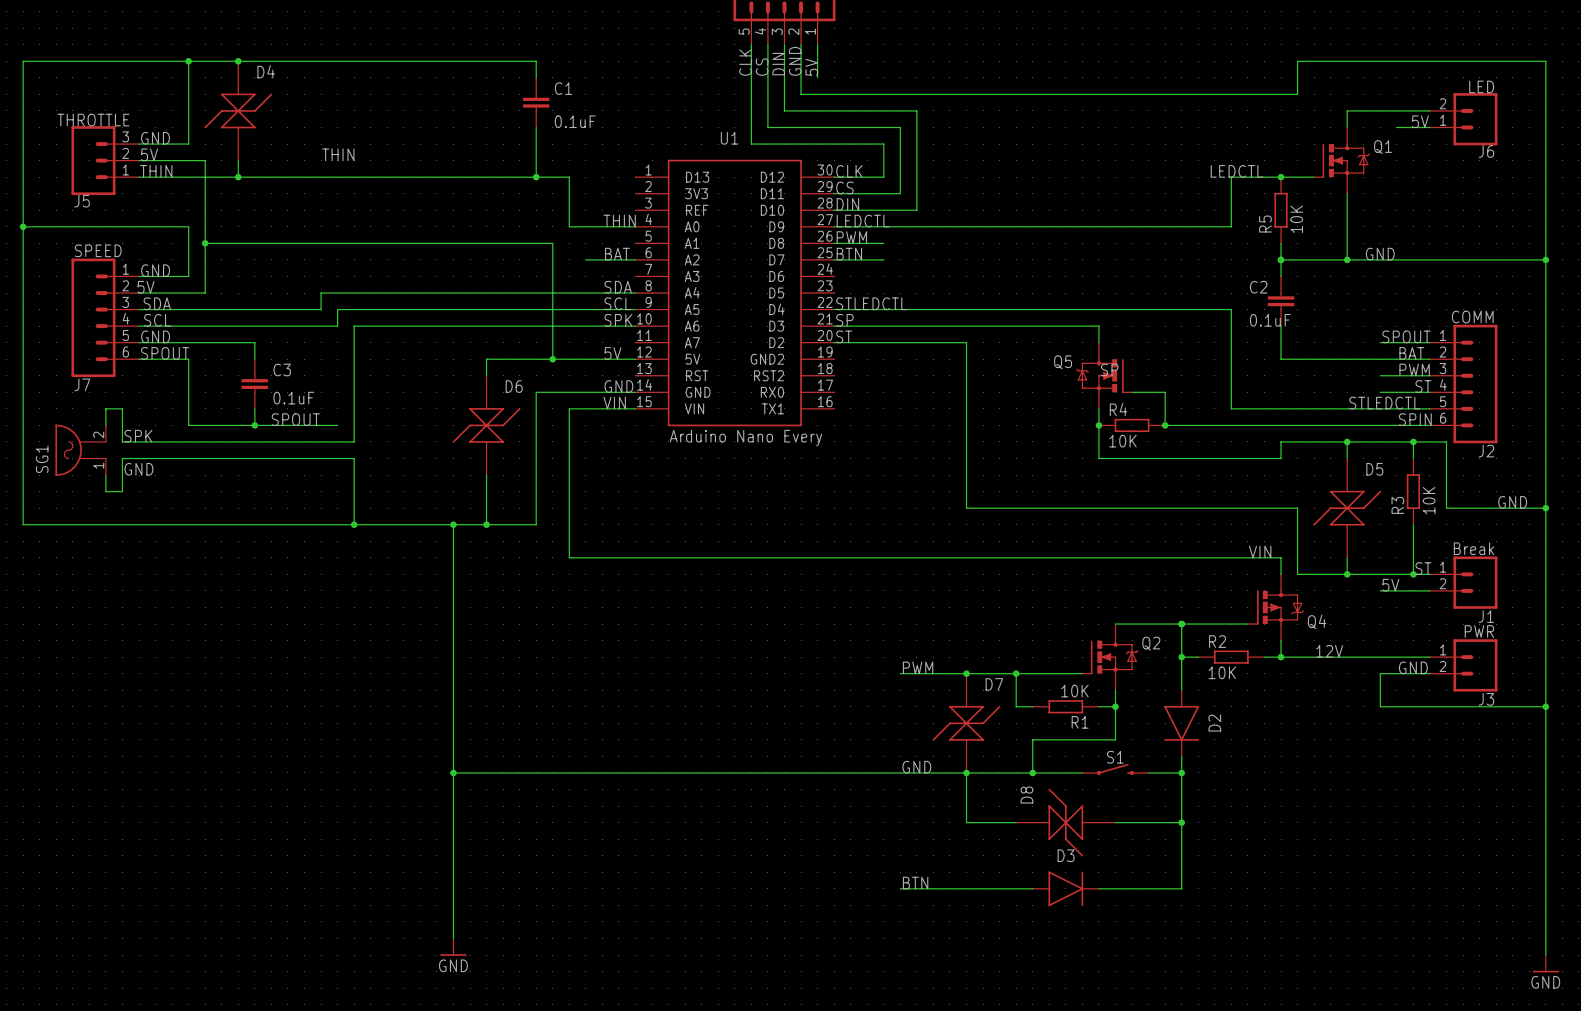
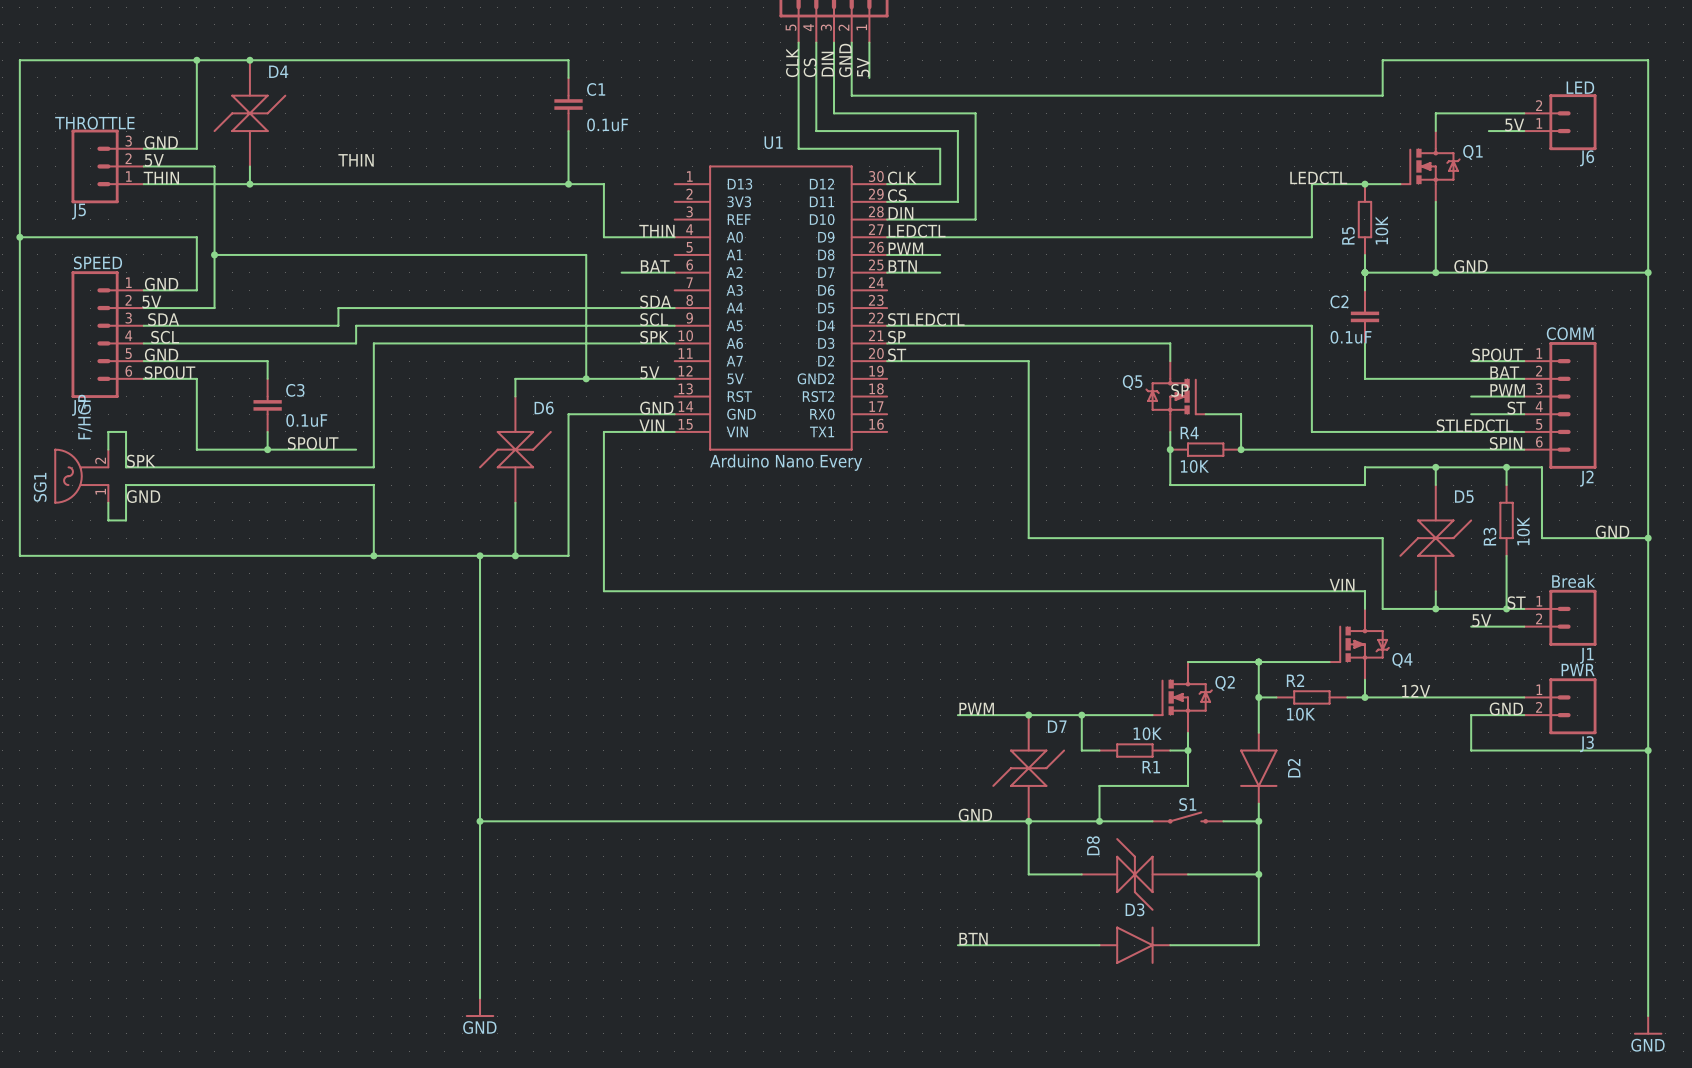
SG1 value: none -> F/HGP (85, 417)

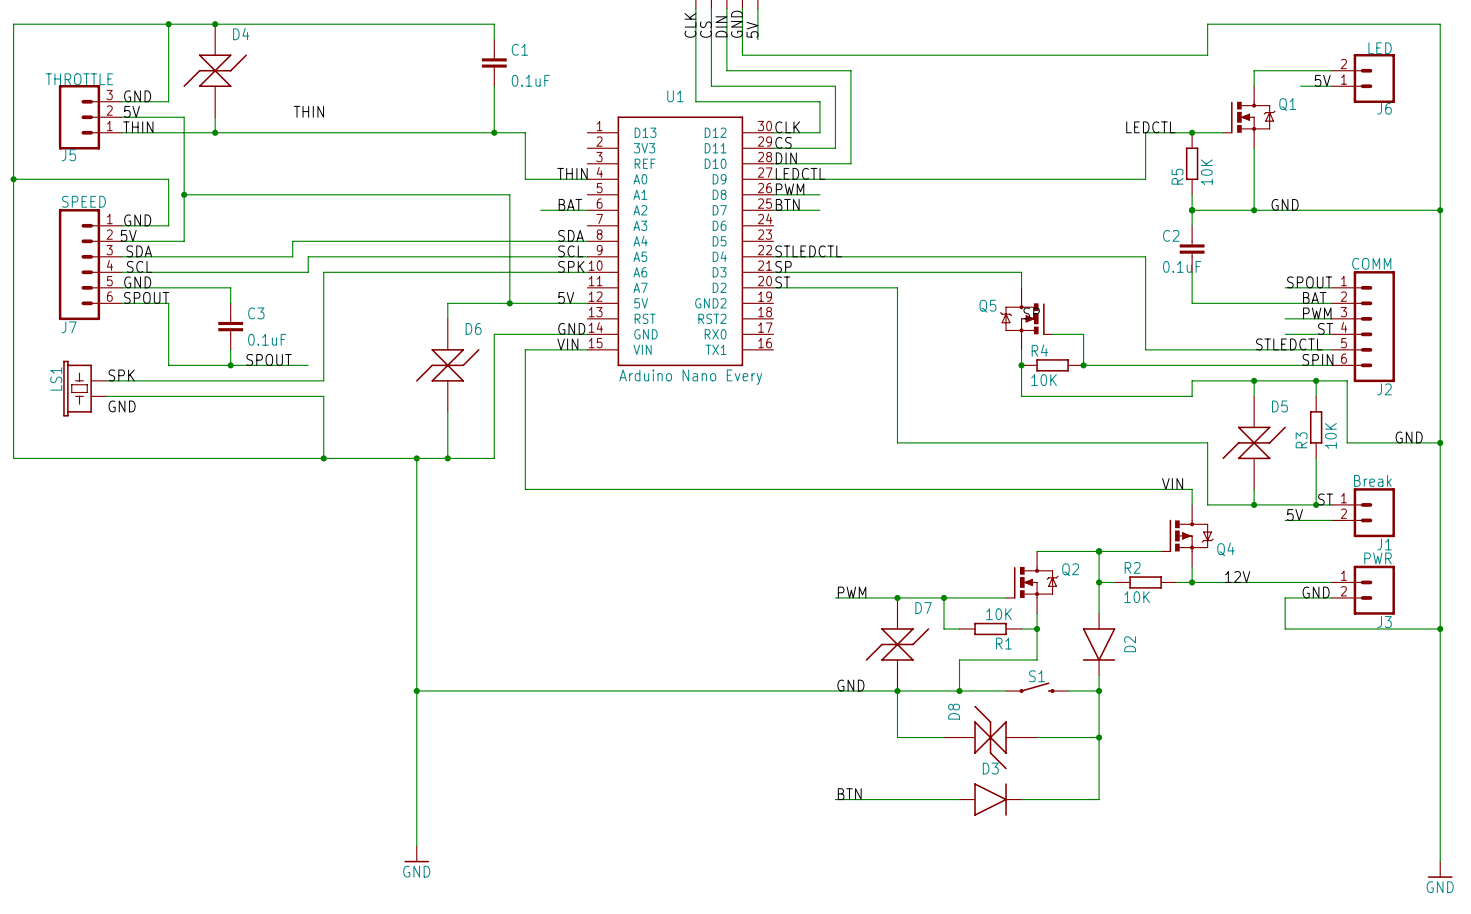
wire: (108, 449) (108, 431) (126, 431) (126, 467) -> none
SG1: F/HGP (81, 476) -> none
LS1: none -> (84, 388)
wire: (126, 485) (126, 520) (108, 520) (108, 502) -> none

